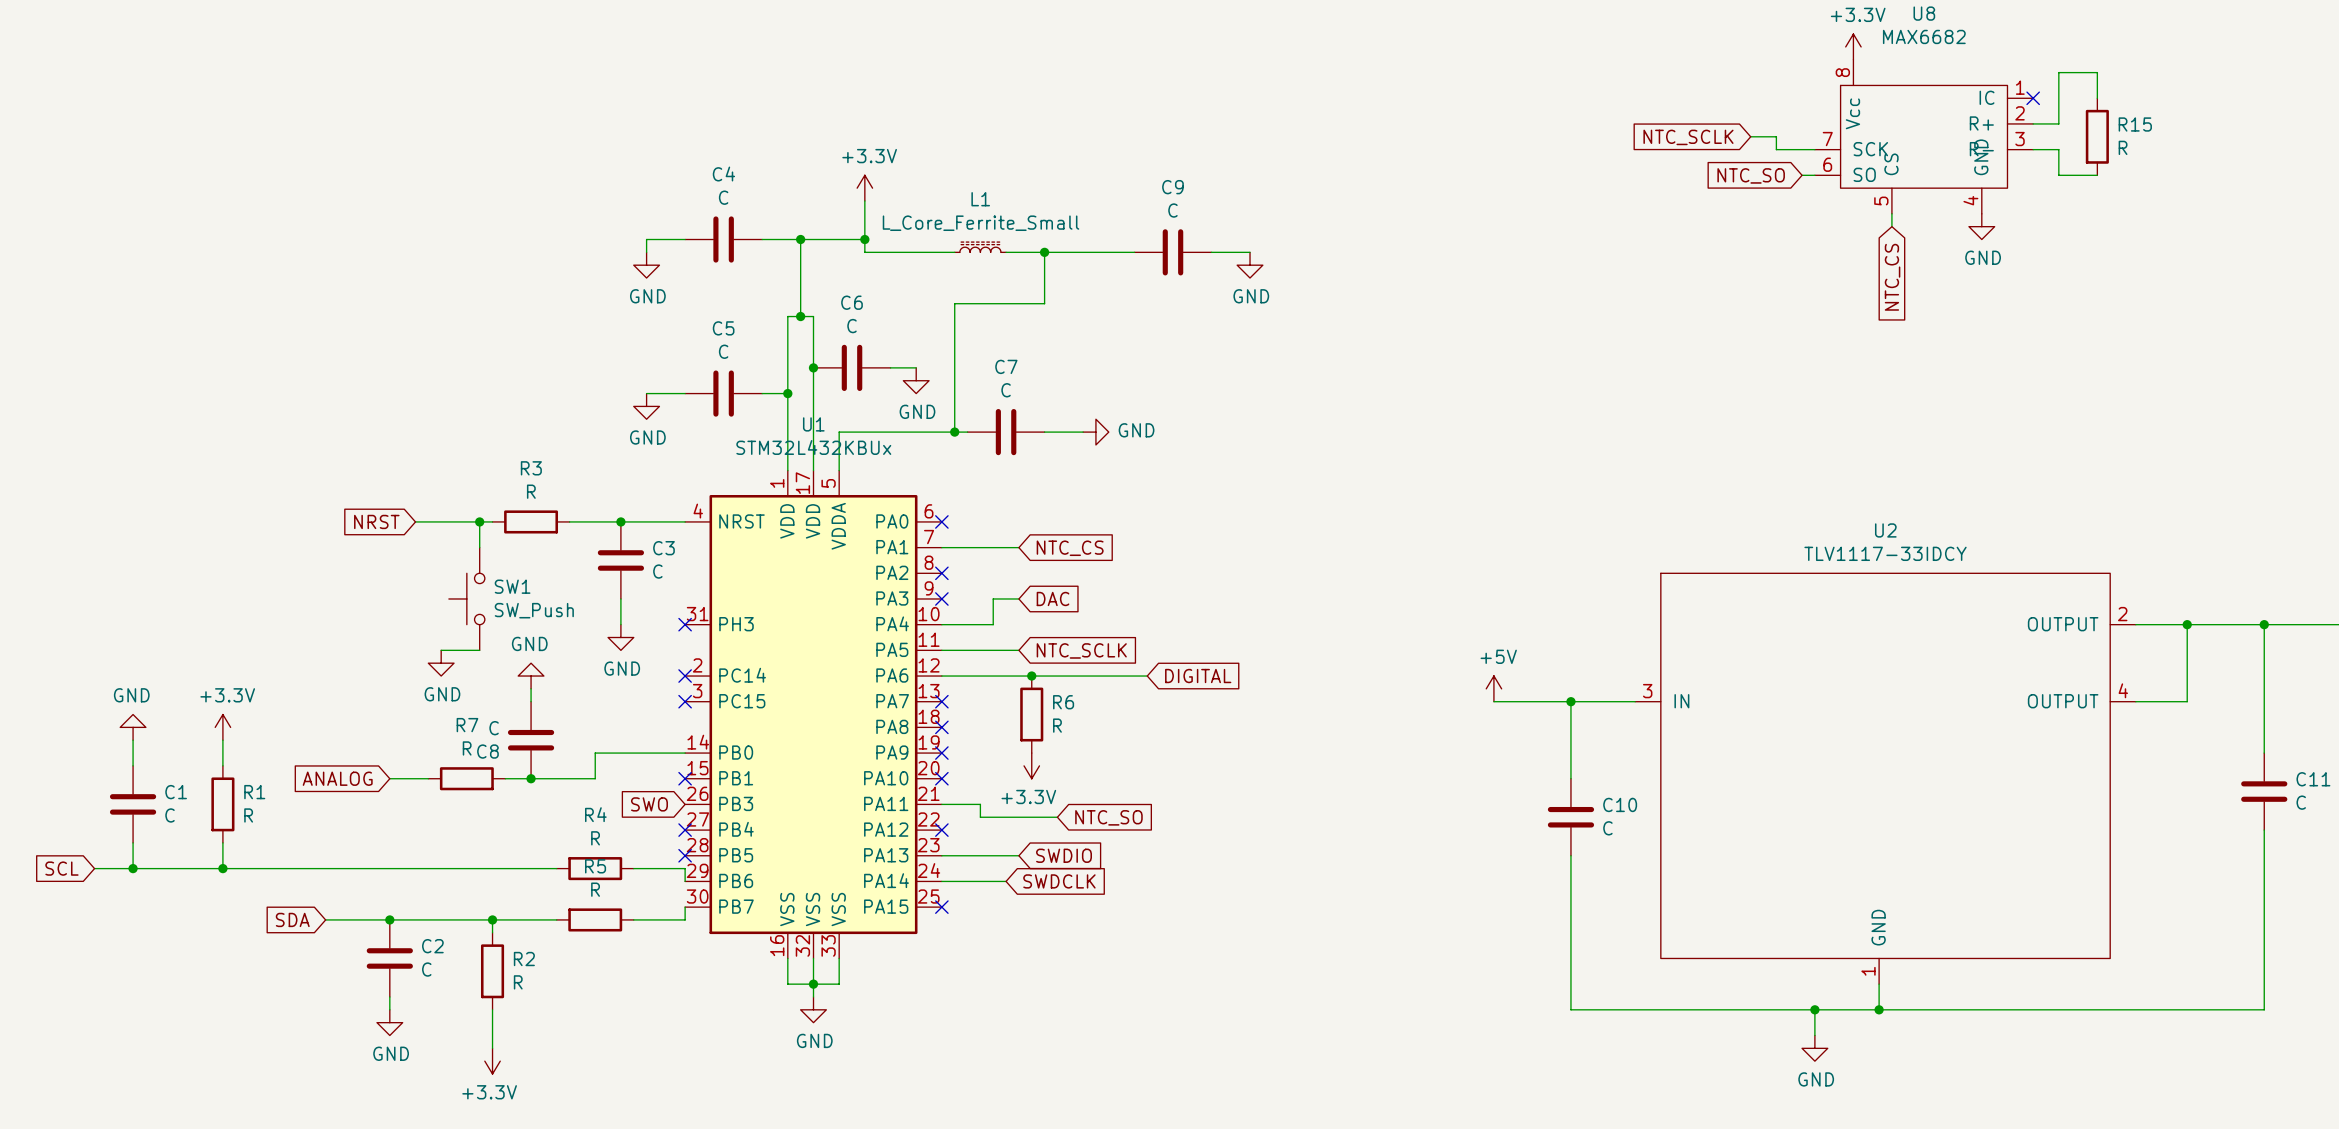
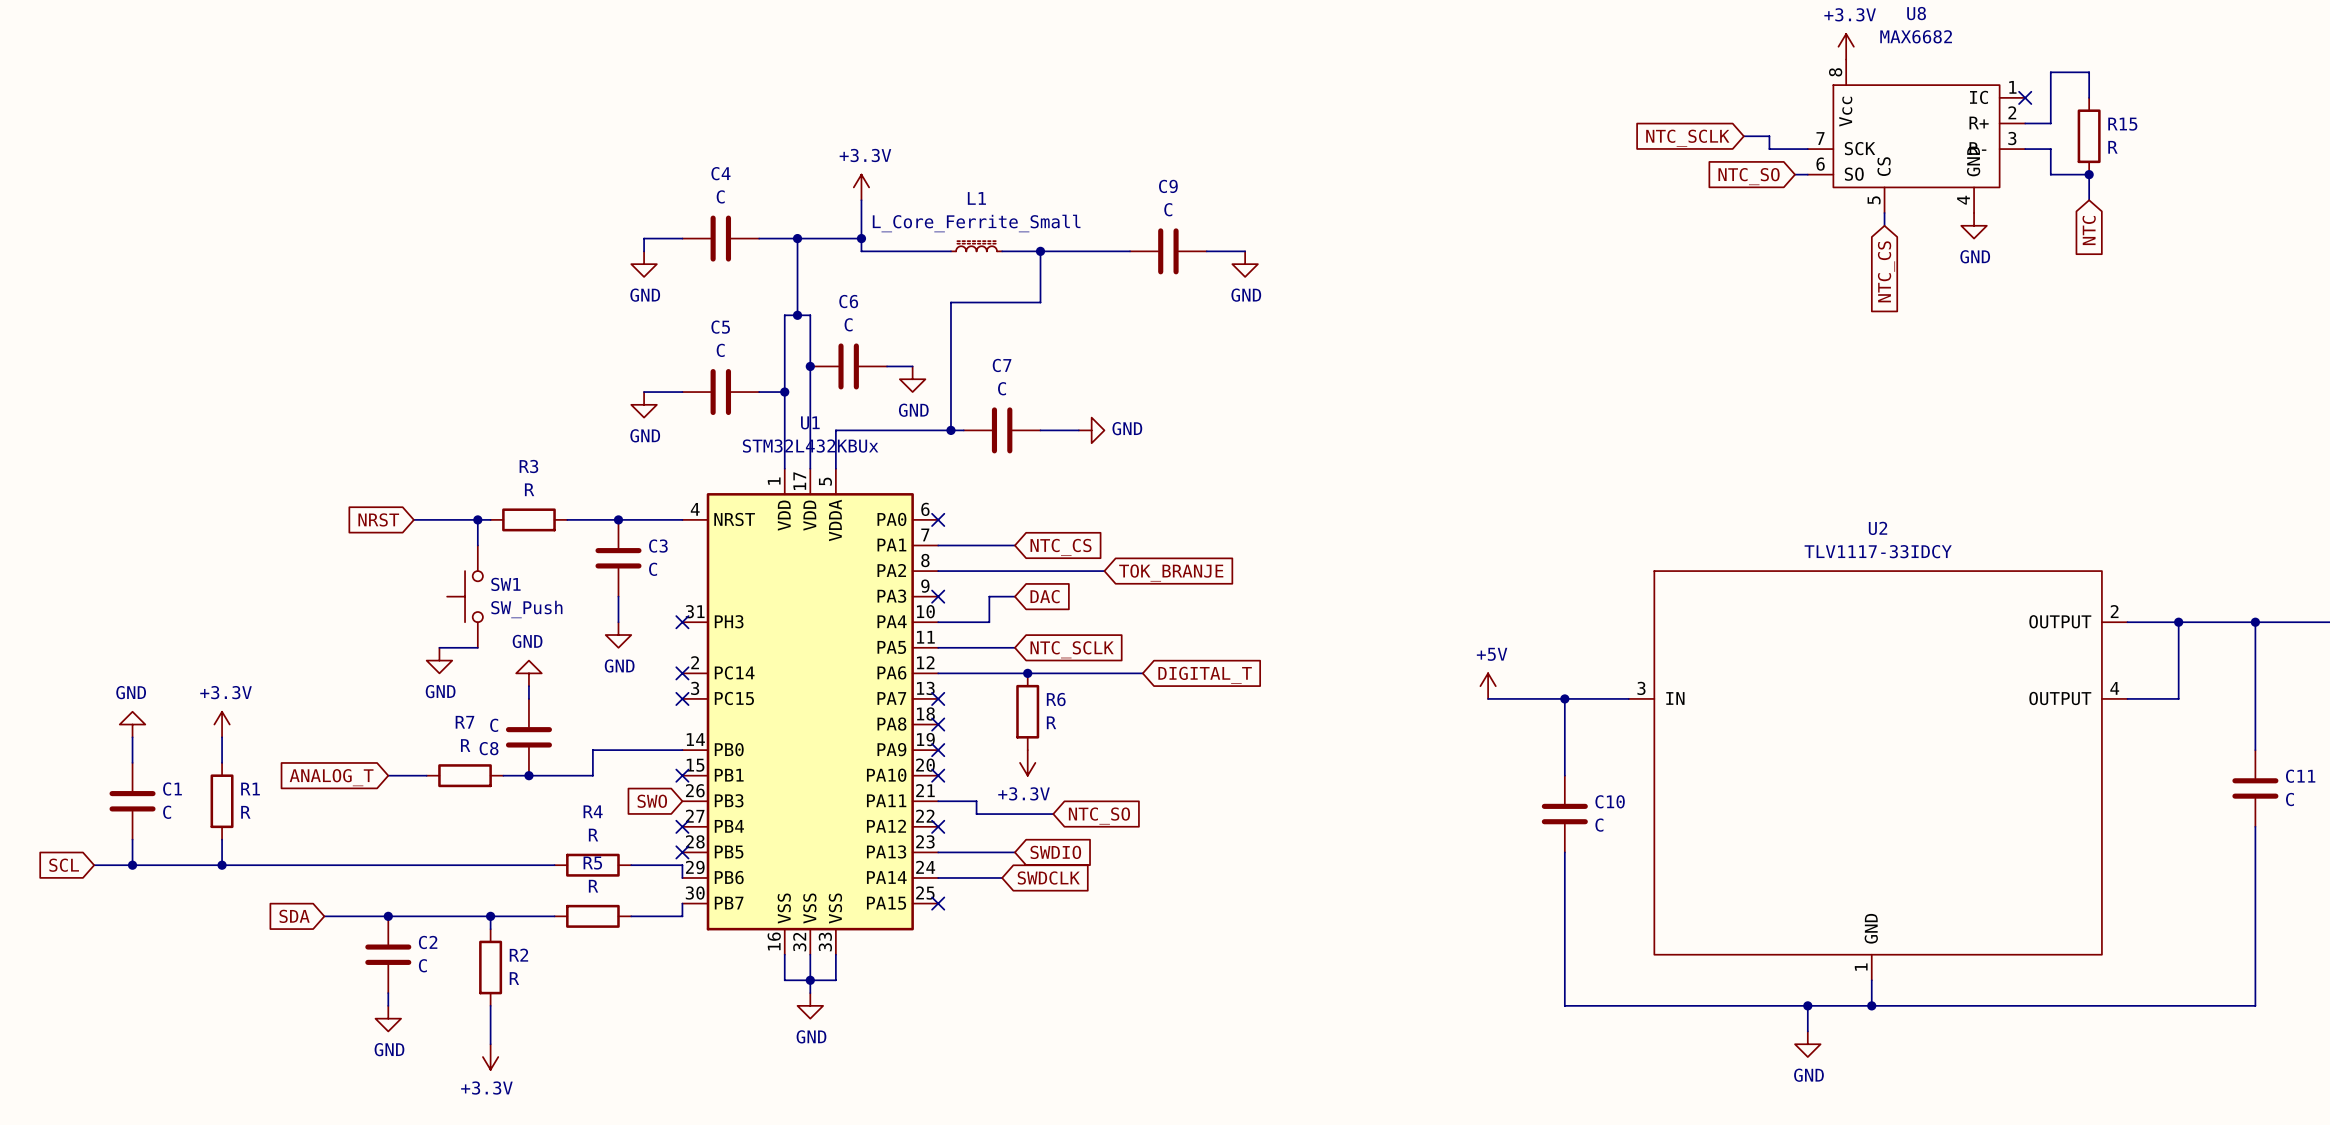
wire: none -> (2089, 174) (2089, 200)
junction: none -> (2089, 174)
global label: none -> NTC (2089, 230)
wire: none -> (938, 571) (1104, 571)
no-connect mark: (941, 573) -> none
global label: none -> TOK_BRANJE (1171, 573)
global label: DIGITAL (1198, 676) -> DIGITAL_T (1205, 675)
global label: ANALOG (337, 778) -> ANALOG_T (331, 777)

